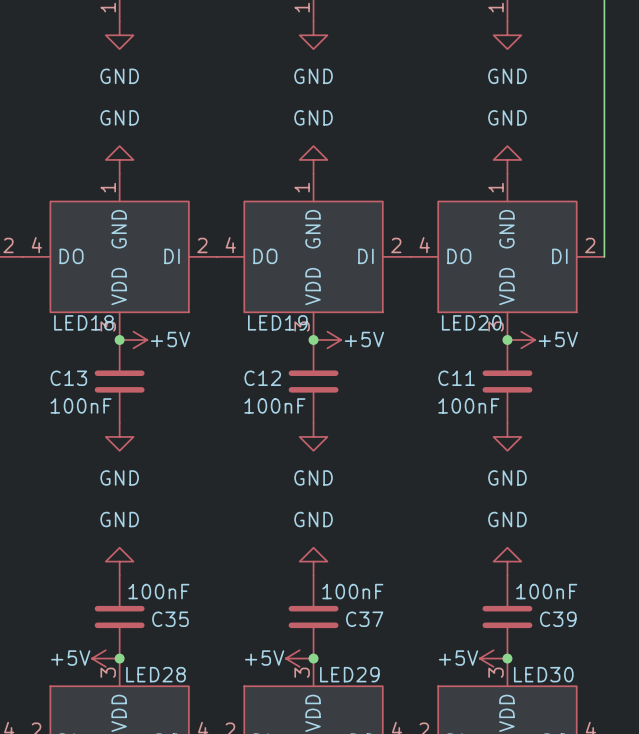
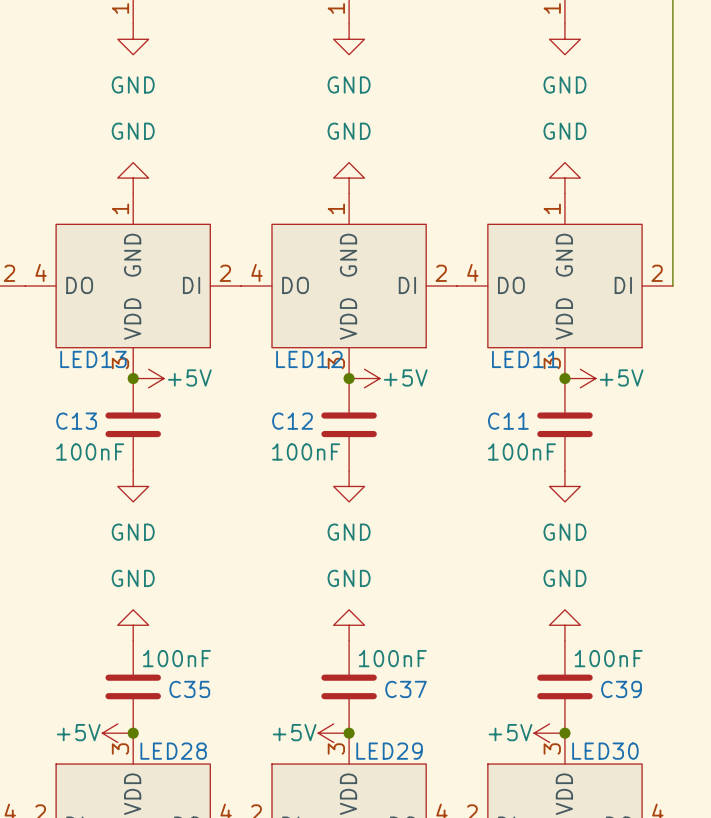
LED18 name: LED18 (83, 322) -> LED13 (93, 359)
LED19 name: LED19 (277, 322) -> LED12 (309, 359)
LED20 name: LED20 (471, 322) -> LED11 (525, 359)

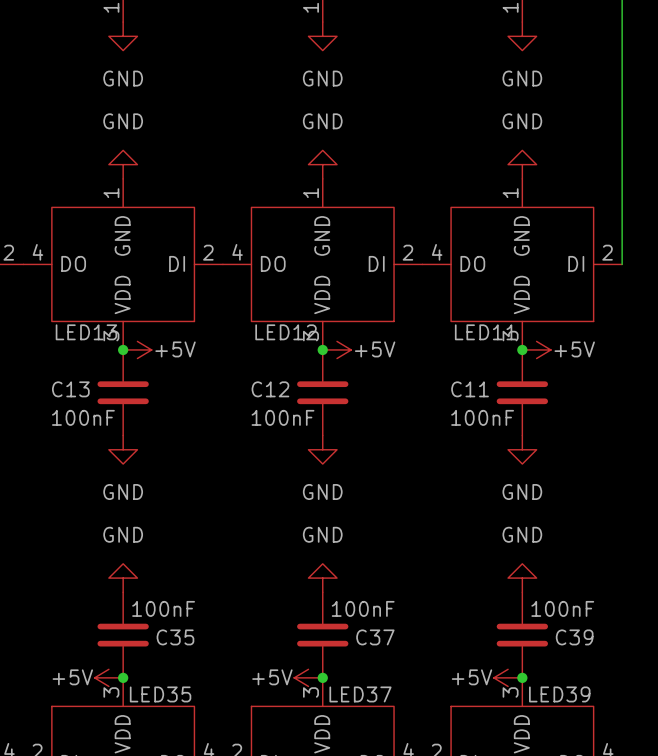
LED28 name: LED28 (173, 751) -> LED35 (160, 694)
LED29 name: LED29 (389, 751) -> LED37 (360, 694)
LED30 name: LED30 (605, 751) -> LED39 (559, 694)

